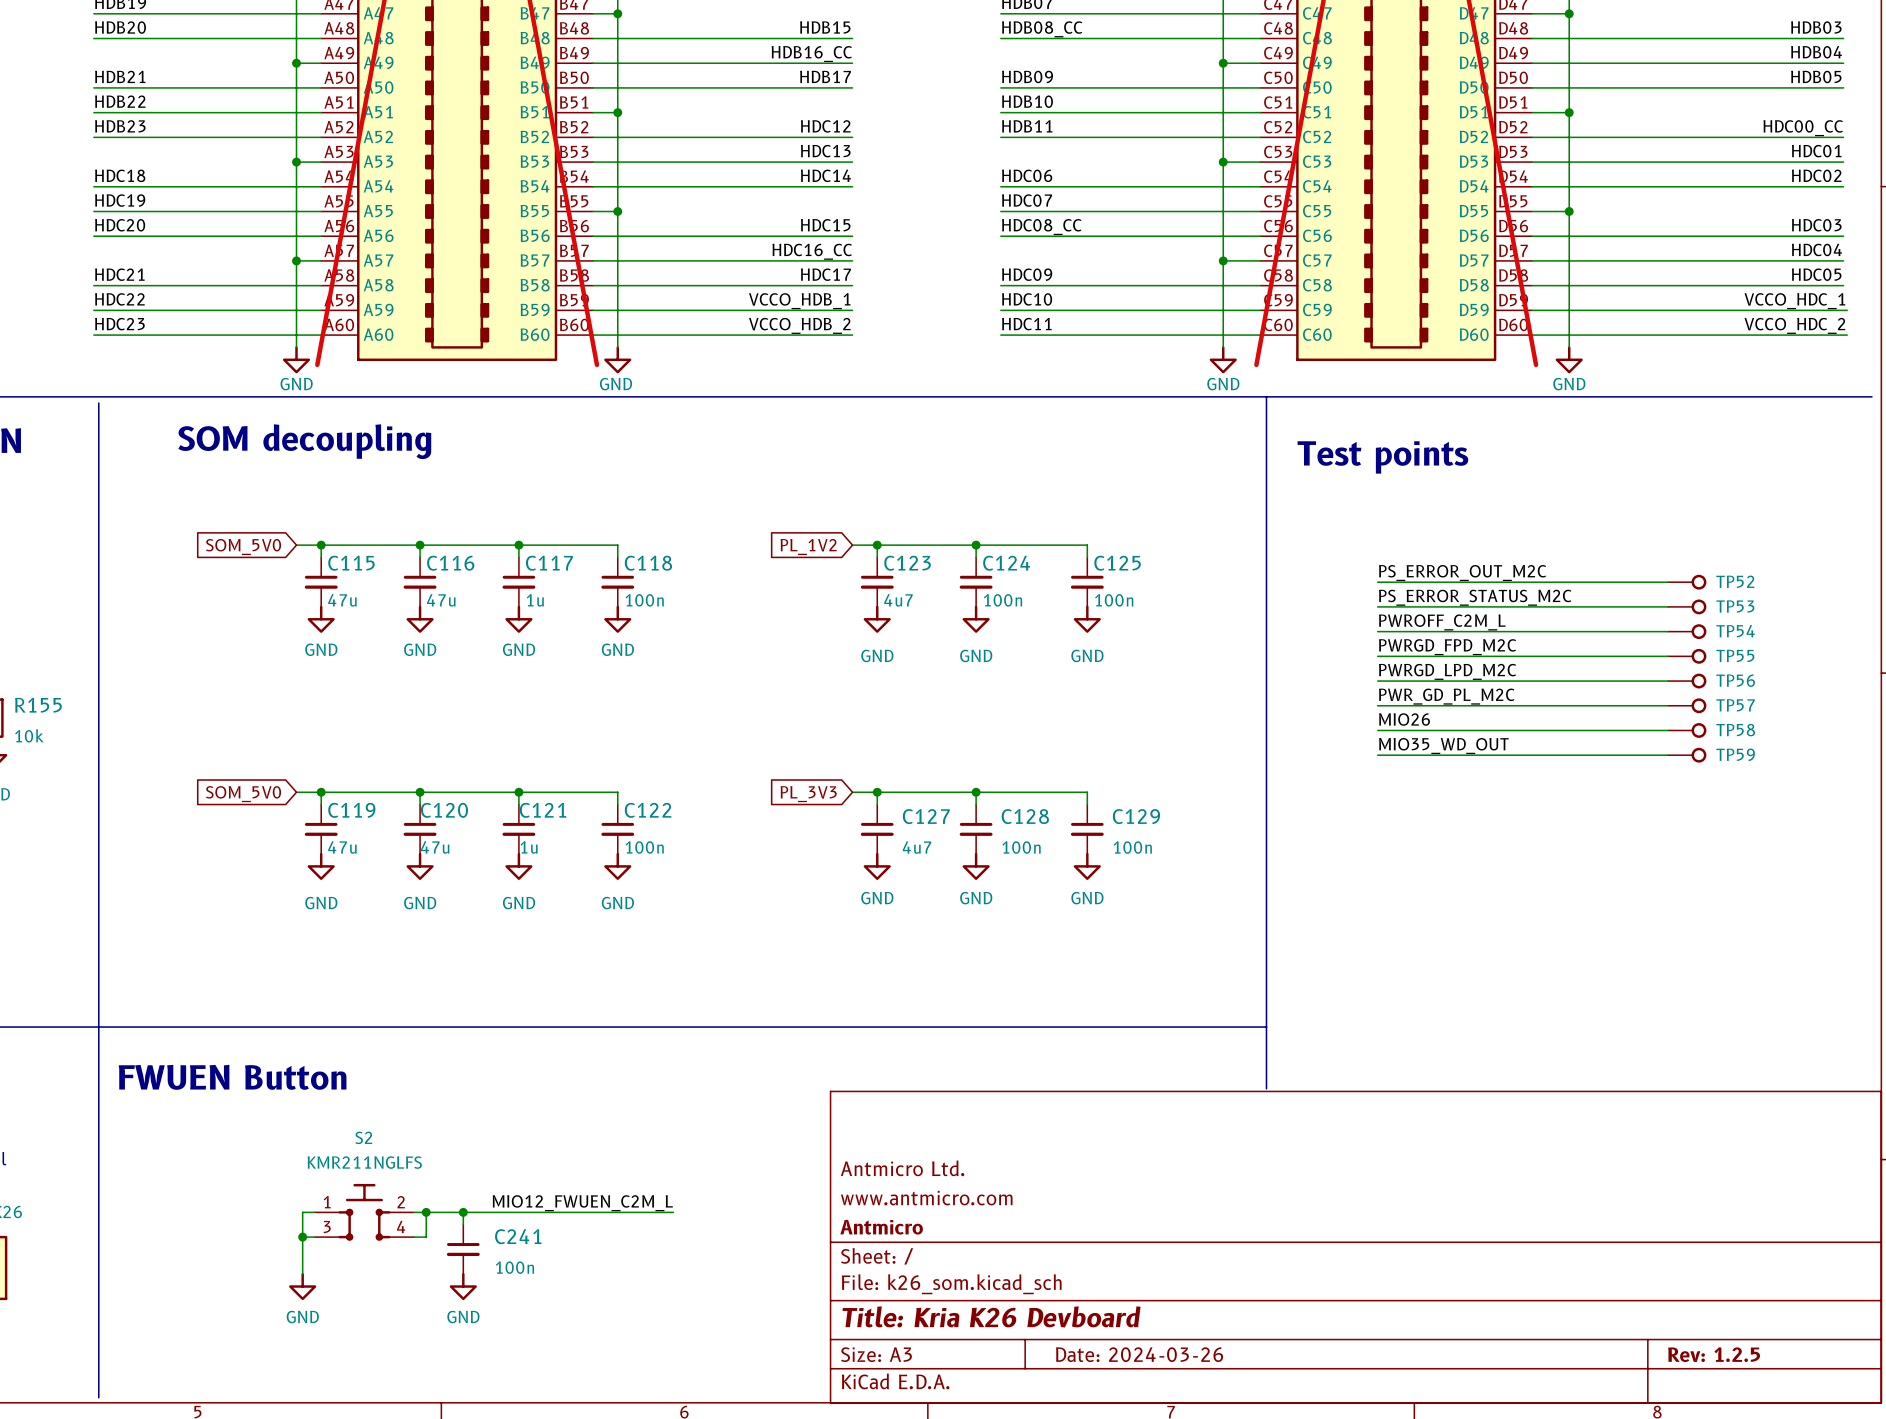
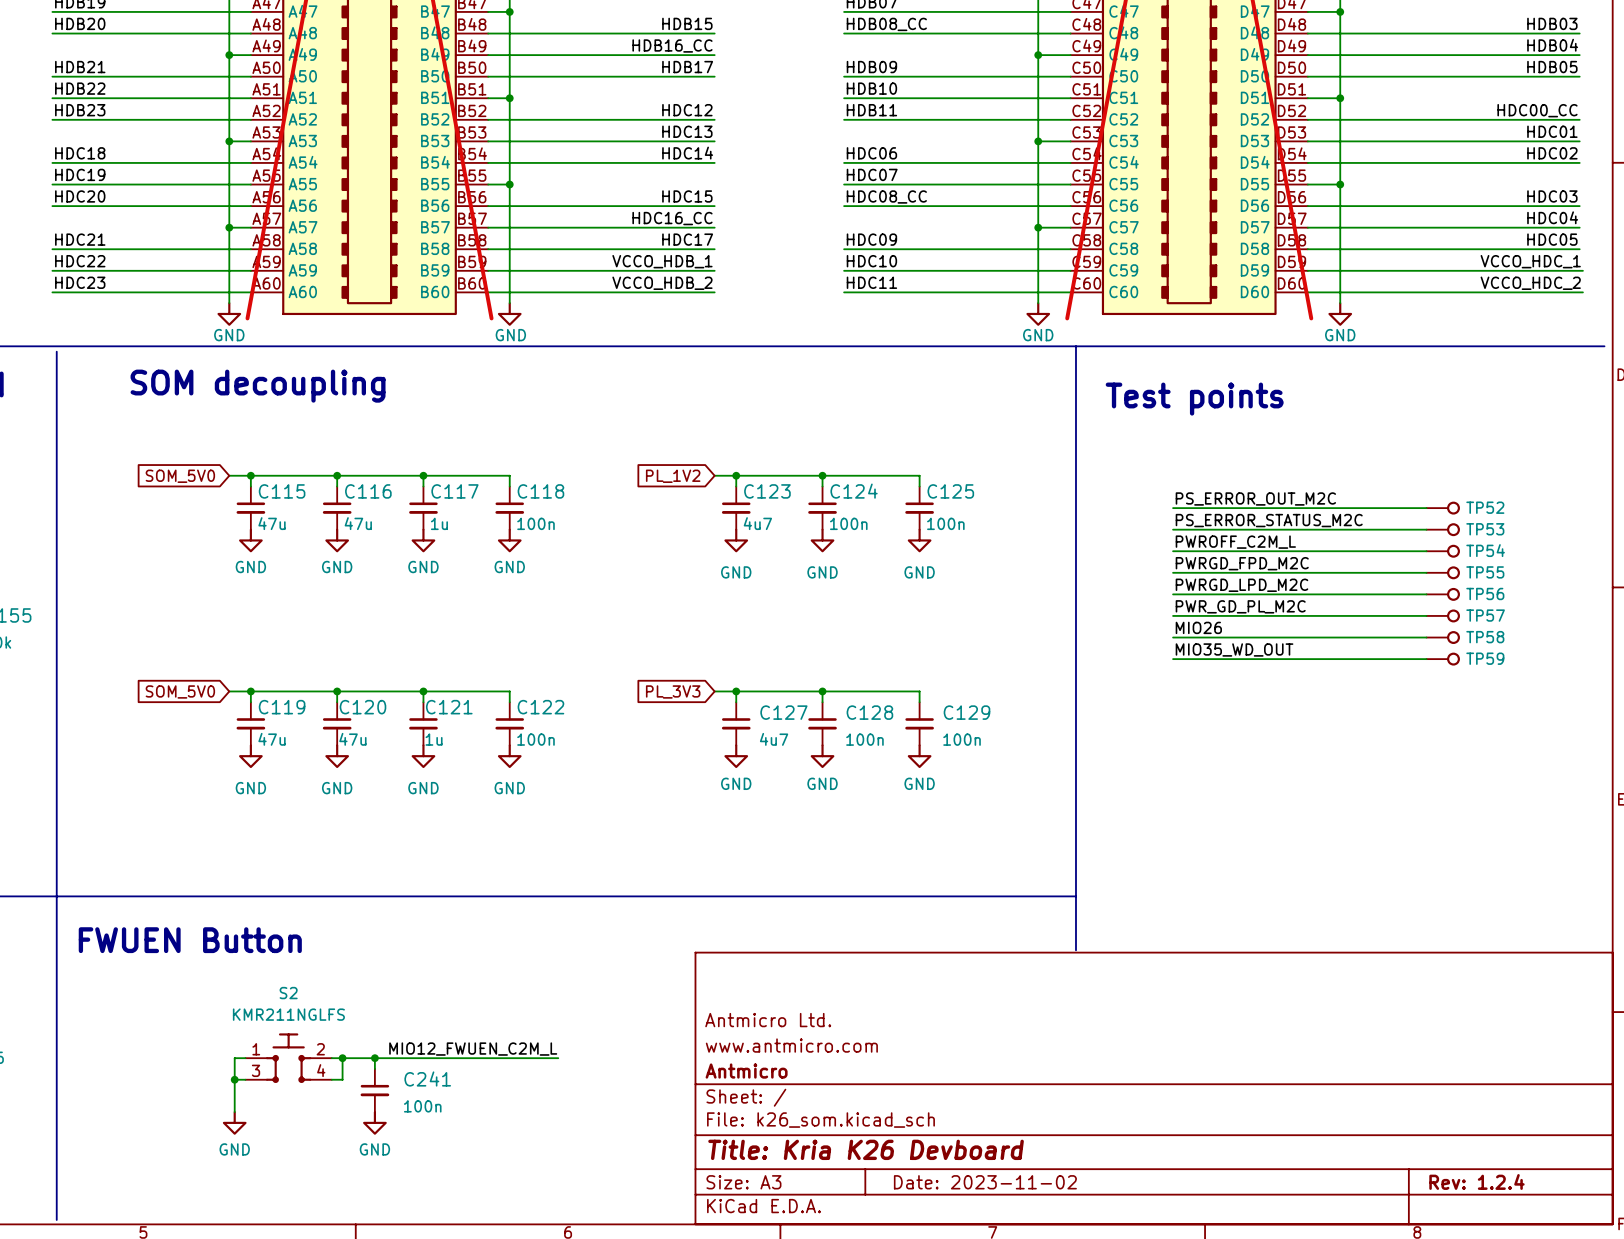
title block: Date: 2024-03-26 (1139, 1354) -> Date: 2023-11-02 (985, 1182)
title block: Rev: 1.2.5 (1714, 1354) -> Rev: 1.2.4 (1476, 1181)

